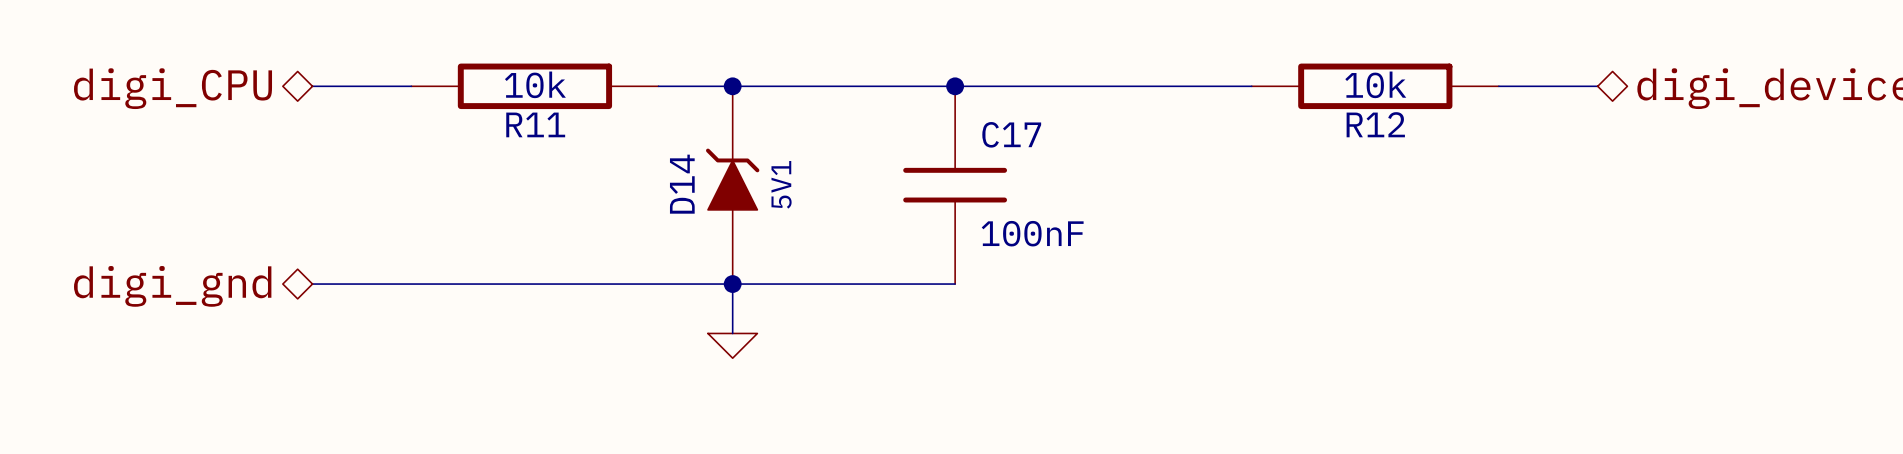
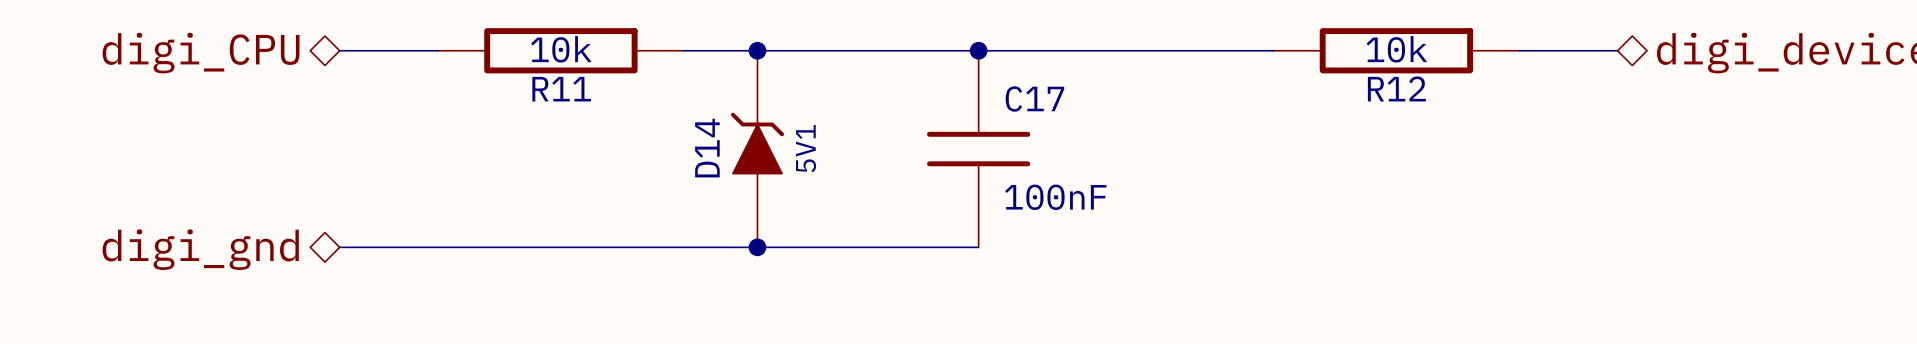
wire: (732, 284) (732, 333) -> none
power symbol: (732, 345) -> none

